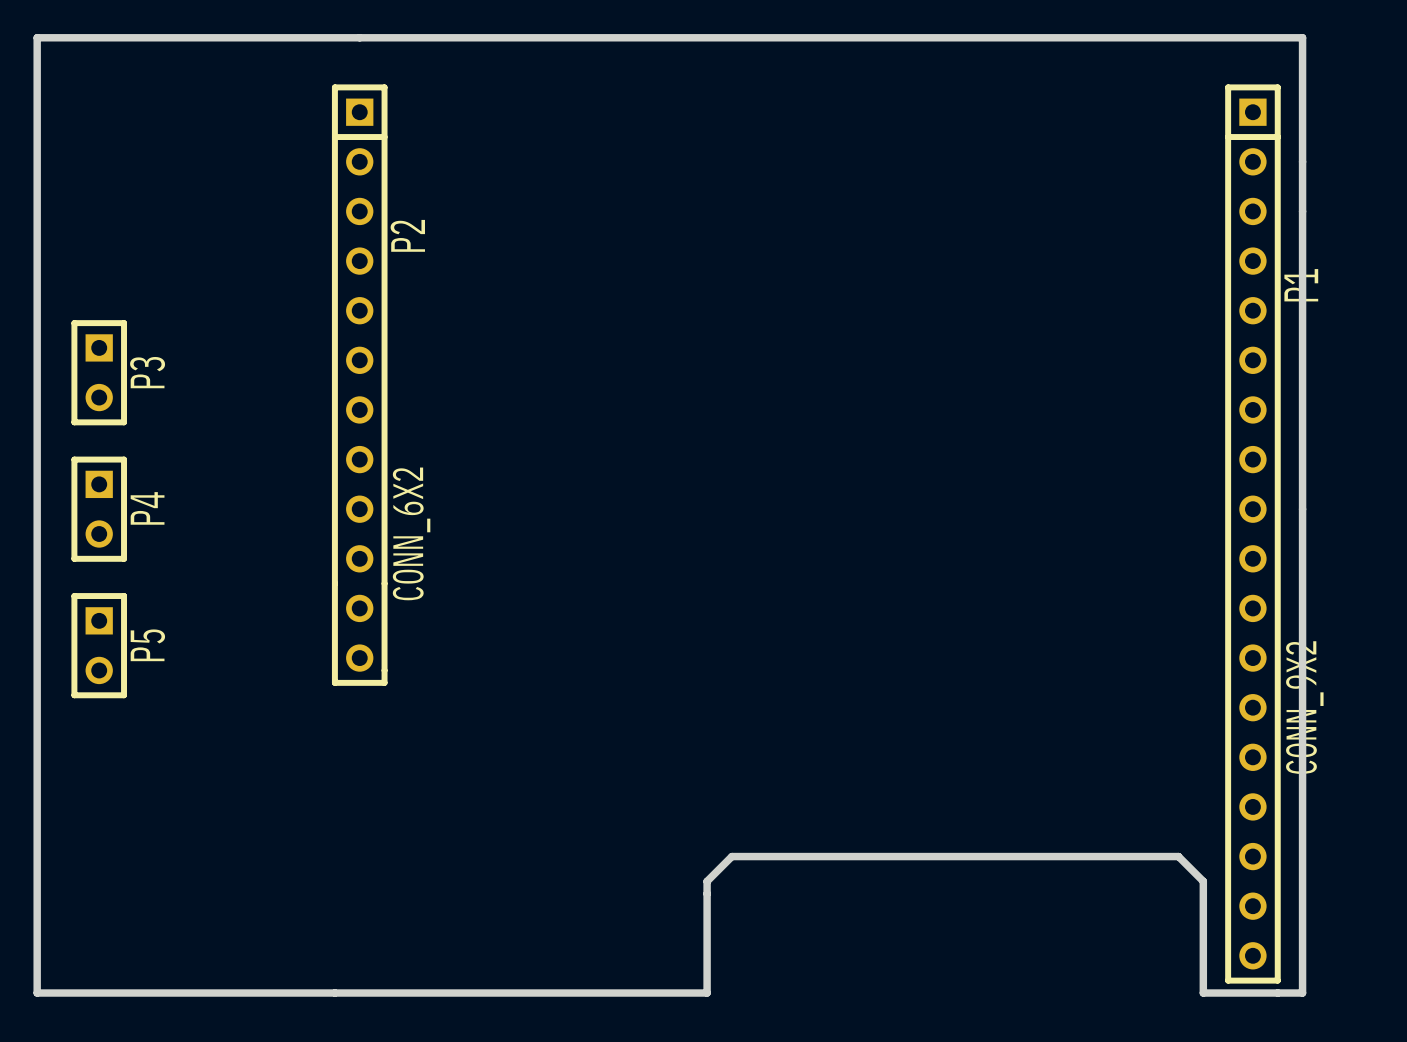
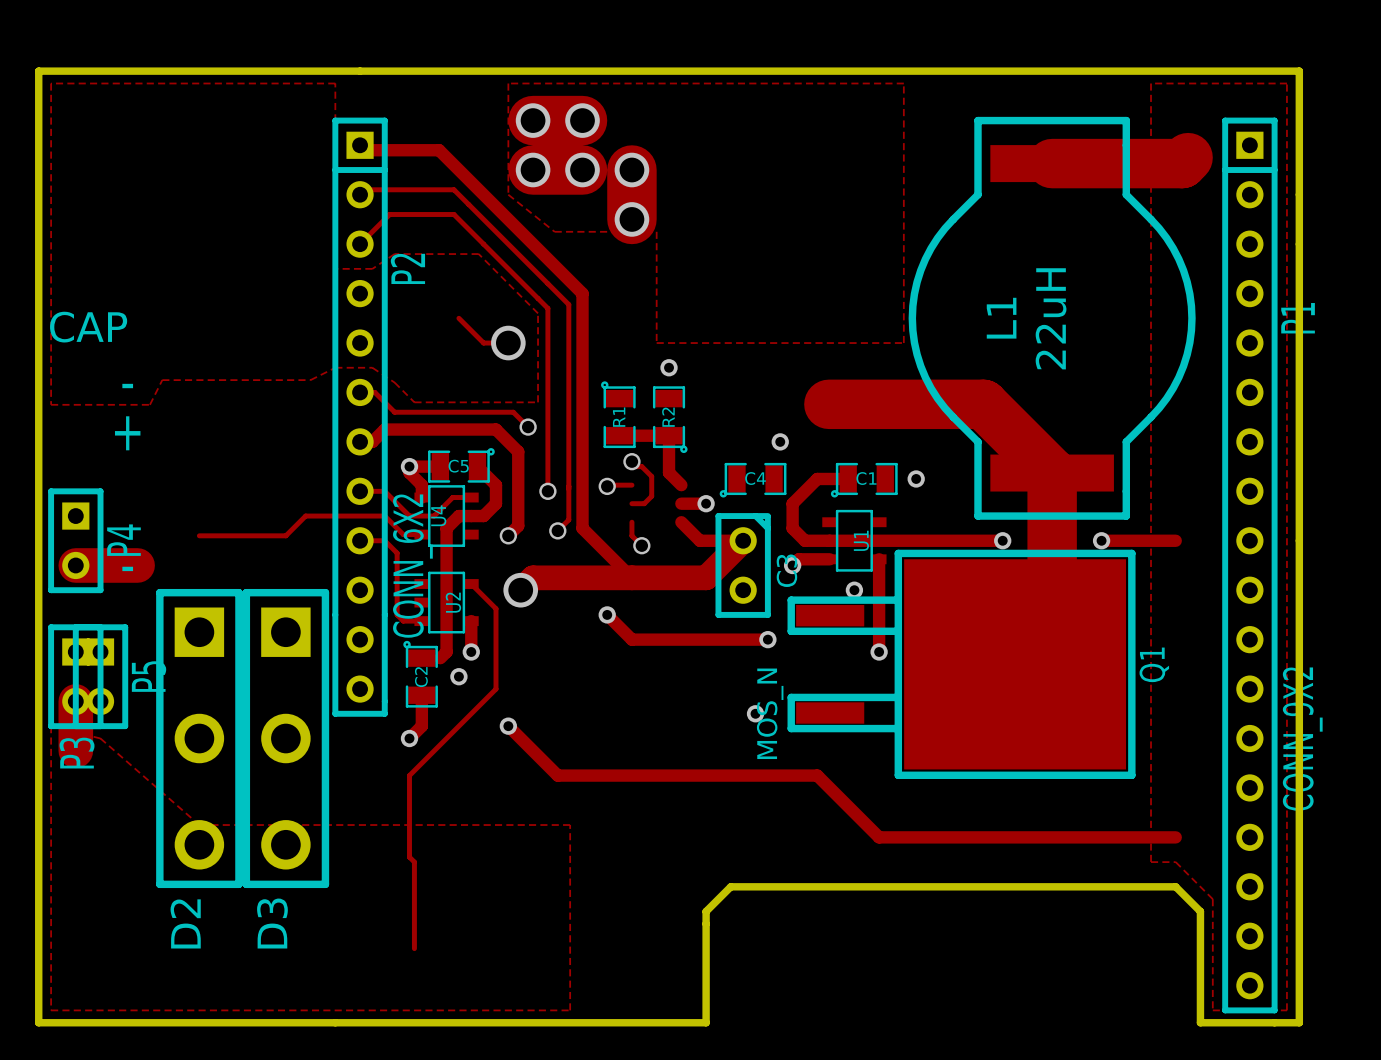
zone outline: none -> (51, 83) (335, 83) (335, 268) (372, 268) (394, 254) (478, 254) (538, 313) (538, 402) (414, 402) (394, 382) (372, 367) (335, 367) (310, 380) (162, 380) (149, 404) (51, 404) (51, 83)
zone outline: none -> (508, 83) (903, 83) (903, 343) (656, 343) (656, 231) (554, 231) (508, 194) (508, 83)
zone outline: none -> (1151, 83) (1286, 83) (1286, 1010) (1212, 1010) (1212, 899) (1175, 862) (1151, 862) (1151, 83)
track: none -> (533, 120) (582, 120)
via: none -> (533, 120)
via: none -> (582, 120)
track: none -> (360, 145) (365, 150) (439, 150) (582, 293) (582, 528) (631, 577)
track: none -> (1188, 157) (1182, 163) (1052, 163)
track: none -> (533, 170) (582, 170)
via: none -> (533, 170)
via: none -> (582, 170)
track: none -> (631, 170) (631, 219)
via: none -> (631, 170)
track: none -> (360, 194) (365, 189) (453, 189) (568, 304) (568, 519) (557, 530)
via: none -> (631, 219)
track: none -> (360, 244) (389, 214) (453, 214) (547, 308) (547, 491)
track: none -> (458, 318) (483, 343) (508, 343)
L1: none -> 22uH (1052, 318)
text: none -> CAP (88, 327)
via: none -> (508, 343)
via: none -> (669, 367)
text: none -> - (127, 386)
track: none -> (360, 392) (374, 392) (394, 412) (513, 412) (528, 427)
P3 position: (99, 372) -> (75, 676)
P3 name position: P3 (147, 372) -> P3 (77, 753)
track: none -> (828, 404) (983, 404) (1052, 473) (1052, 627) (1015, 664)
R1: none -> (618, 414)
R2: none -> (670, 419)
via: none -> (528, 427)
text: none -> + (127, 433)
track: none -> (619, 435) (669, 435) (669, 472) (681, 485)
track: none -> (360, 441) (372, 441) (384, 429) (496, 429) (518, 451) (518, 525) (508, 535)
via: none -> (780, 441)
track: none -> (631, 461) (636, 466) (641, 466) (651, 476) (651, 496) (644, 503) (631, 503)
via: none -> (631, 461)
C5: none -> (461, 465)
via: none -> (409, 466)
track: none -> (440, 466) (409, 466) (409, 472) (421, 485) (421, 497)
track: none -> (477, 466) (496, 485) (496, 503) (483, 516) (458, 516) (446, 528) (446, 652) (440, 658)
track: none -> (848, 478) (817, 478) (792, 503) (792, 528) (804, 540) (1002, 540)
via: none -> (916, 478)
C4: none -> (753, 480)
C1: none -> (864, 480)
track: none -> (631, 485) (607, 486)
via: none -> (607, 486)
track: none -> (360, 491) (384, 491) (409, 516) (434, 516) (452, 497) (471, 497)
via: none -> (547, 491)
track: none -> (681, 503) (706, 503)
via: none -> (706, 503)
U4: none -> (446, 516)
track: none -> (631, 522) (631, 535) (641, 545)
track: none -> (681, 522) (699, 540) (743, 540) (706, 577) (533, 577) (520, 590)
via: none -> (557, 530)
track: none -> (421, 534) (403, 534) (384, 516) (305, 516) (285, 535) (199, 535)
via: none -> (508, 535)
P4 position: (99, 509) -> (75, 540)
track: none -> (360, 540) (384, 540) (397, 553) (397, 614) (403, 621) (421, 621)
U1: none -> (854, 540)
via: none -> (1002, 540)
track: none -> (1101, 540) (1175, 540)
via: none -> (1101, 540)
via: none -> (641, 545)
track: none -> (829, 559) (798, 559) (792, 565)
track: none -> (879, 559) (879, 652)
track: none -> (75, 565) (137, 565)
C3: none -> (743, 565)
via: none -> (792, 565)
text: none -> - (127, 568)
track: none -> (471, 584) (496, 608) (496, 689) (409, 775) (409, 857) (414, 862) (414, 948)
via: none -> (520, 590)
via: none -> (854, 590)
U2: none -> (446, 602)
track: none -> (607, 614) (631, 639) (767, 639)
via: none -> (607, 614)
track: none -> (471, 621) (471, 652)
via: none -> (767, 639)
via: none -> (471, 652)
via: none -> (879, 652)
Q1: none -> MOS_N (961, 664)
C2: none -> (420, 674)
via: none -> (458, 676)
track: none -> (421, 695) (421, 726) (409, 738)
track: none -> (75, 701) (75, 750)
via: none -> (755, 713)
zone outline: none -> (51, 726) (100, 738) (199, 825) (570, 825) (570, 1010) (51, 1010) (51, 726)
track: none -> (508, 726) (557, 775) (817, 775) (879, 837) (1175, 837)
via: none -> (508, 726)
D2: none -> (199, 738)
D3: none -> (285, 738)
via: none -> (409, 738)

